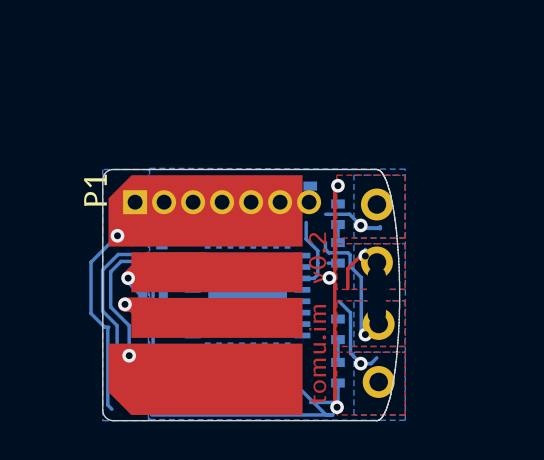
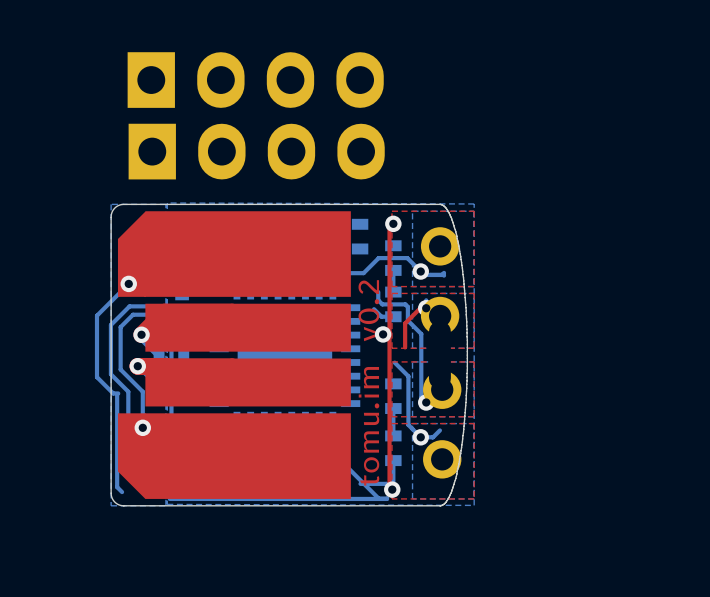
part: none -> (255, 80)
part: none -> (256, 151)
P1: (222, 202) -> none
bottom track: none -> (378, 258) (363, 273) (328, 273)
bottom track: (306, 222) (306, 239) (317, 250) (317, 274) (314, 278) (302, 278) -> none
bottom track: none -> (374, 309) (381, 316)

